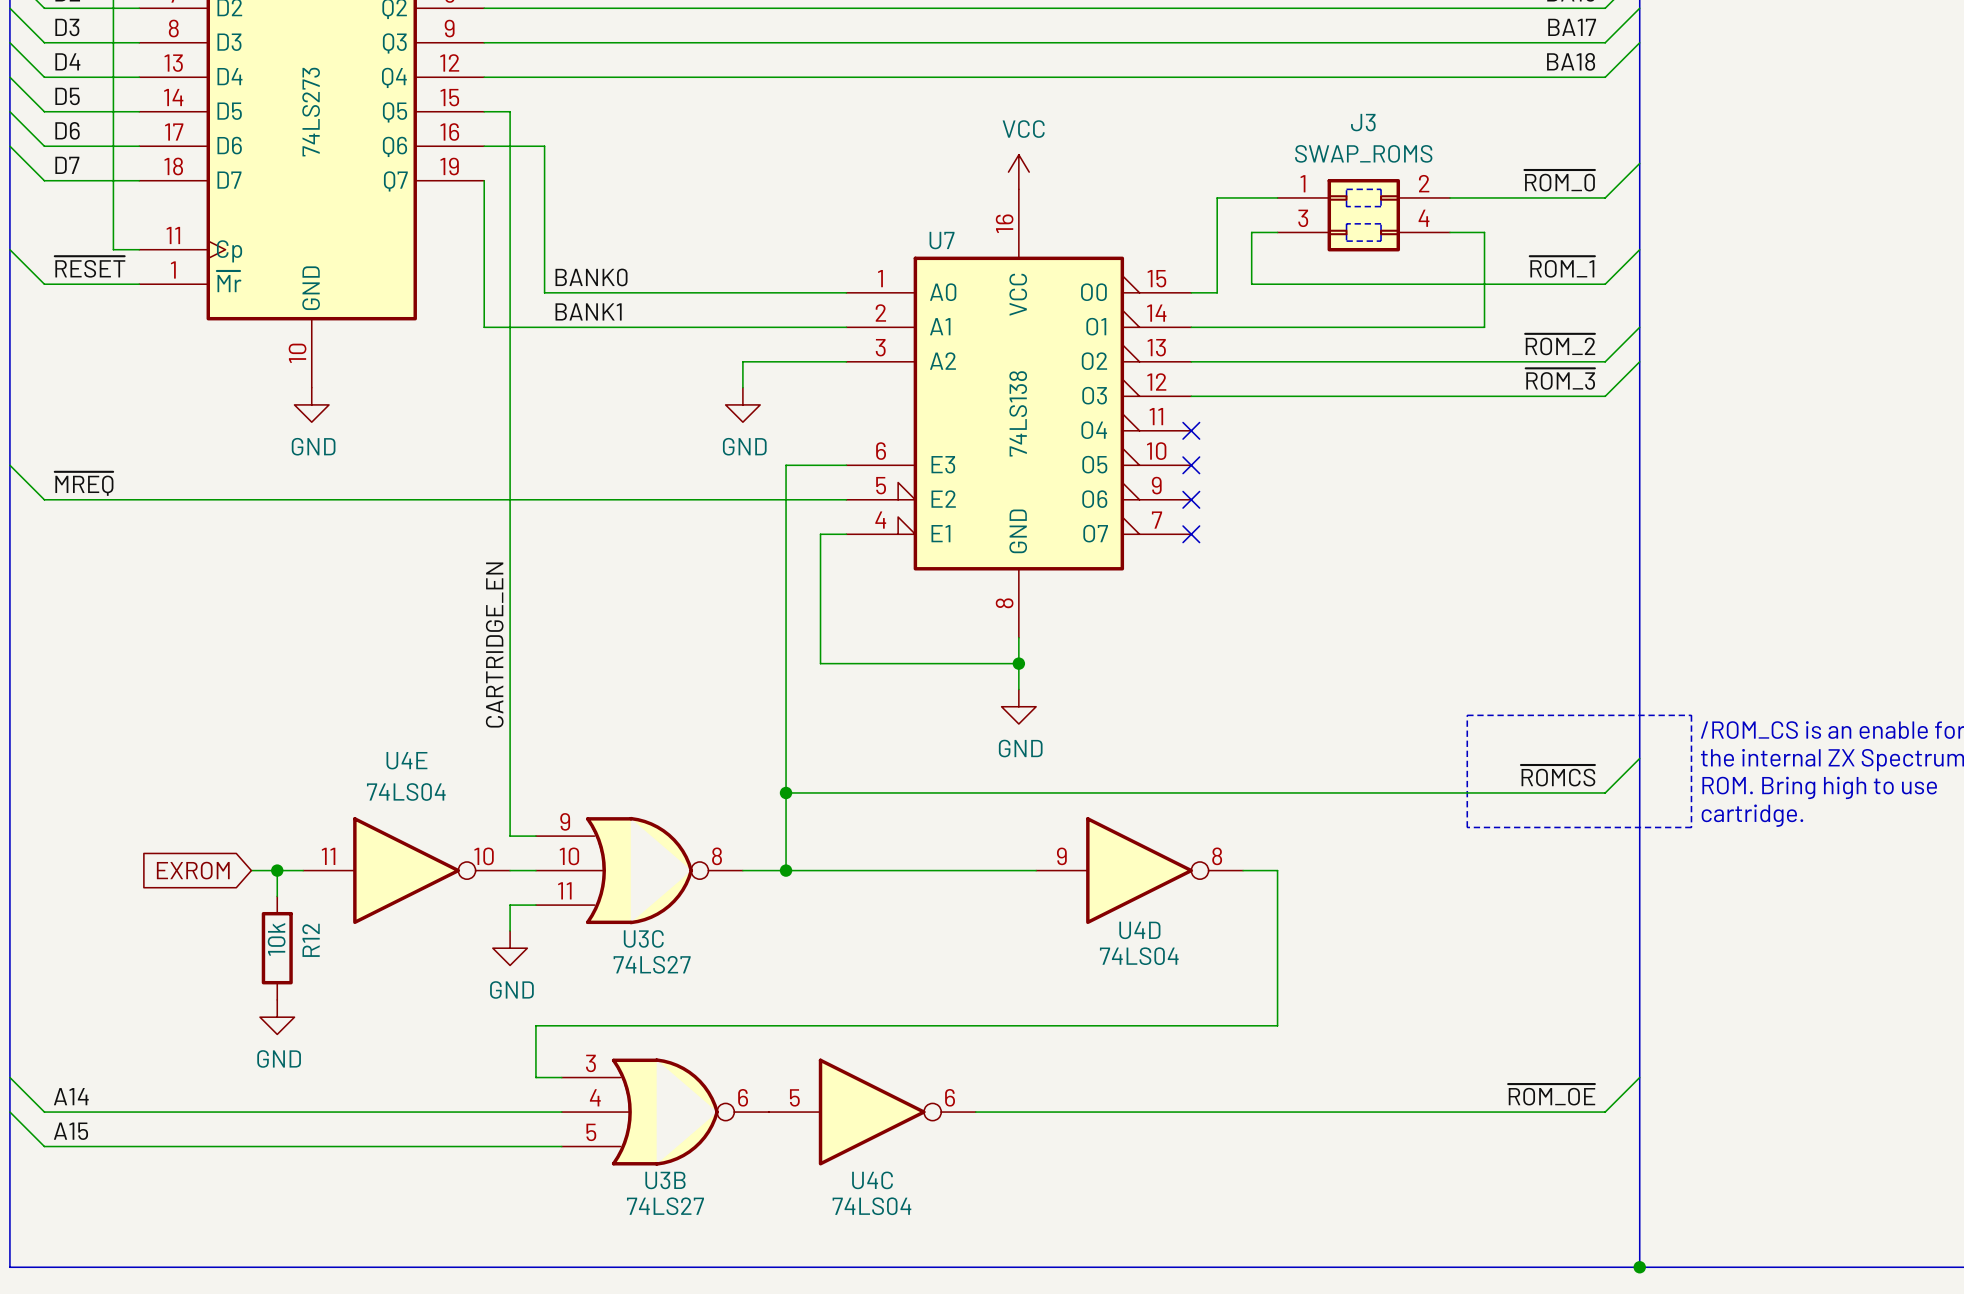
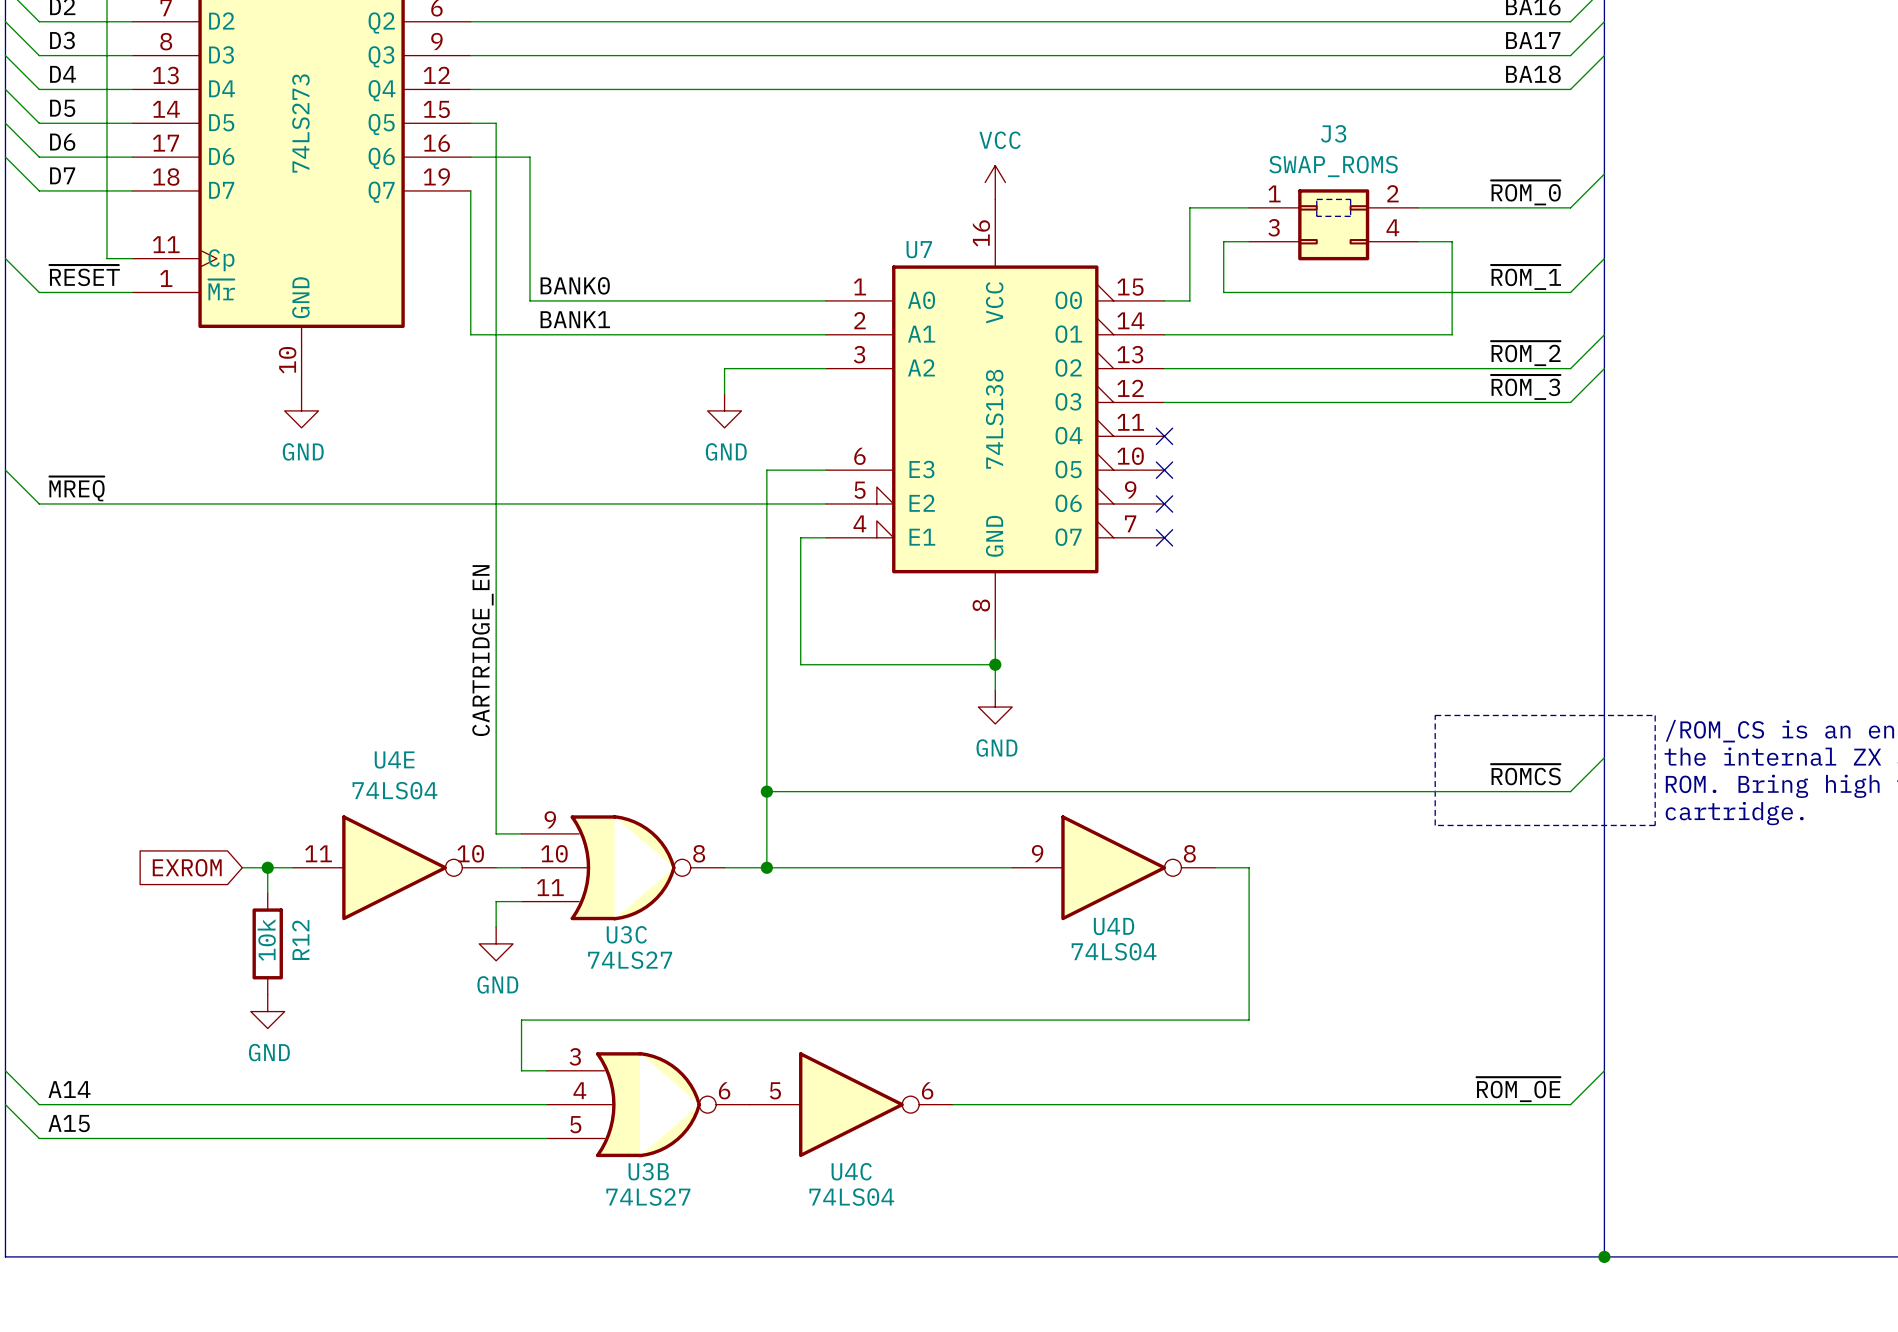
line: (1346, 223) (1346, 241) (1381, 241) (1381, 223) (1346, 223) -> none

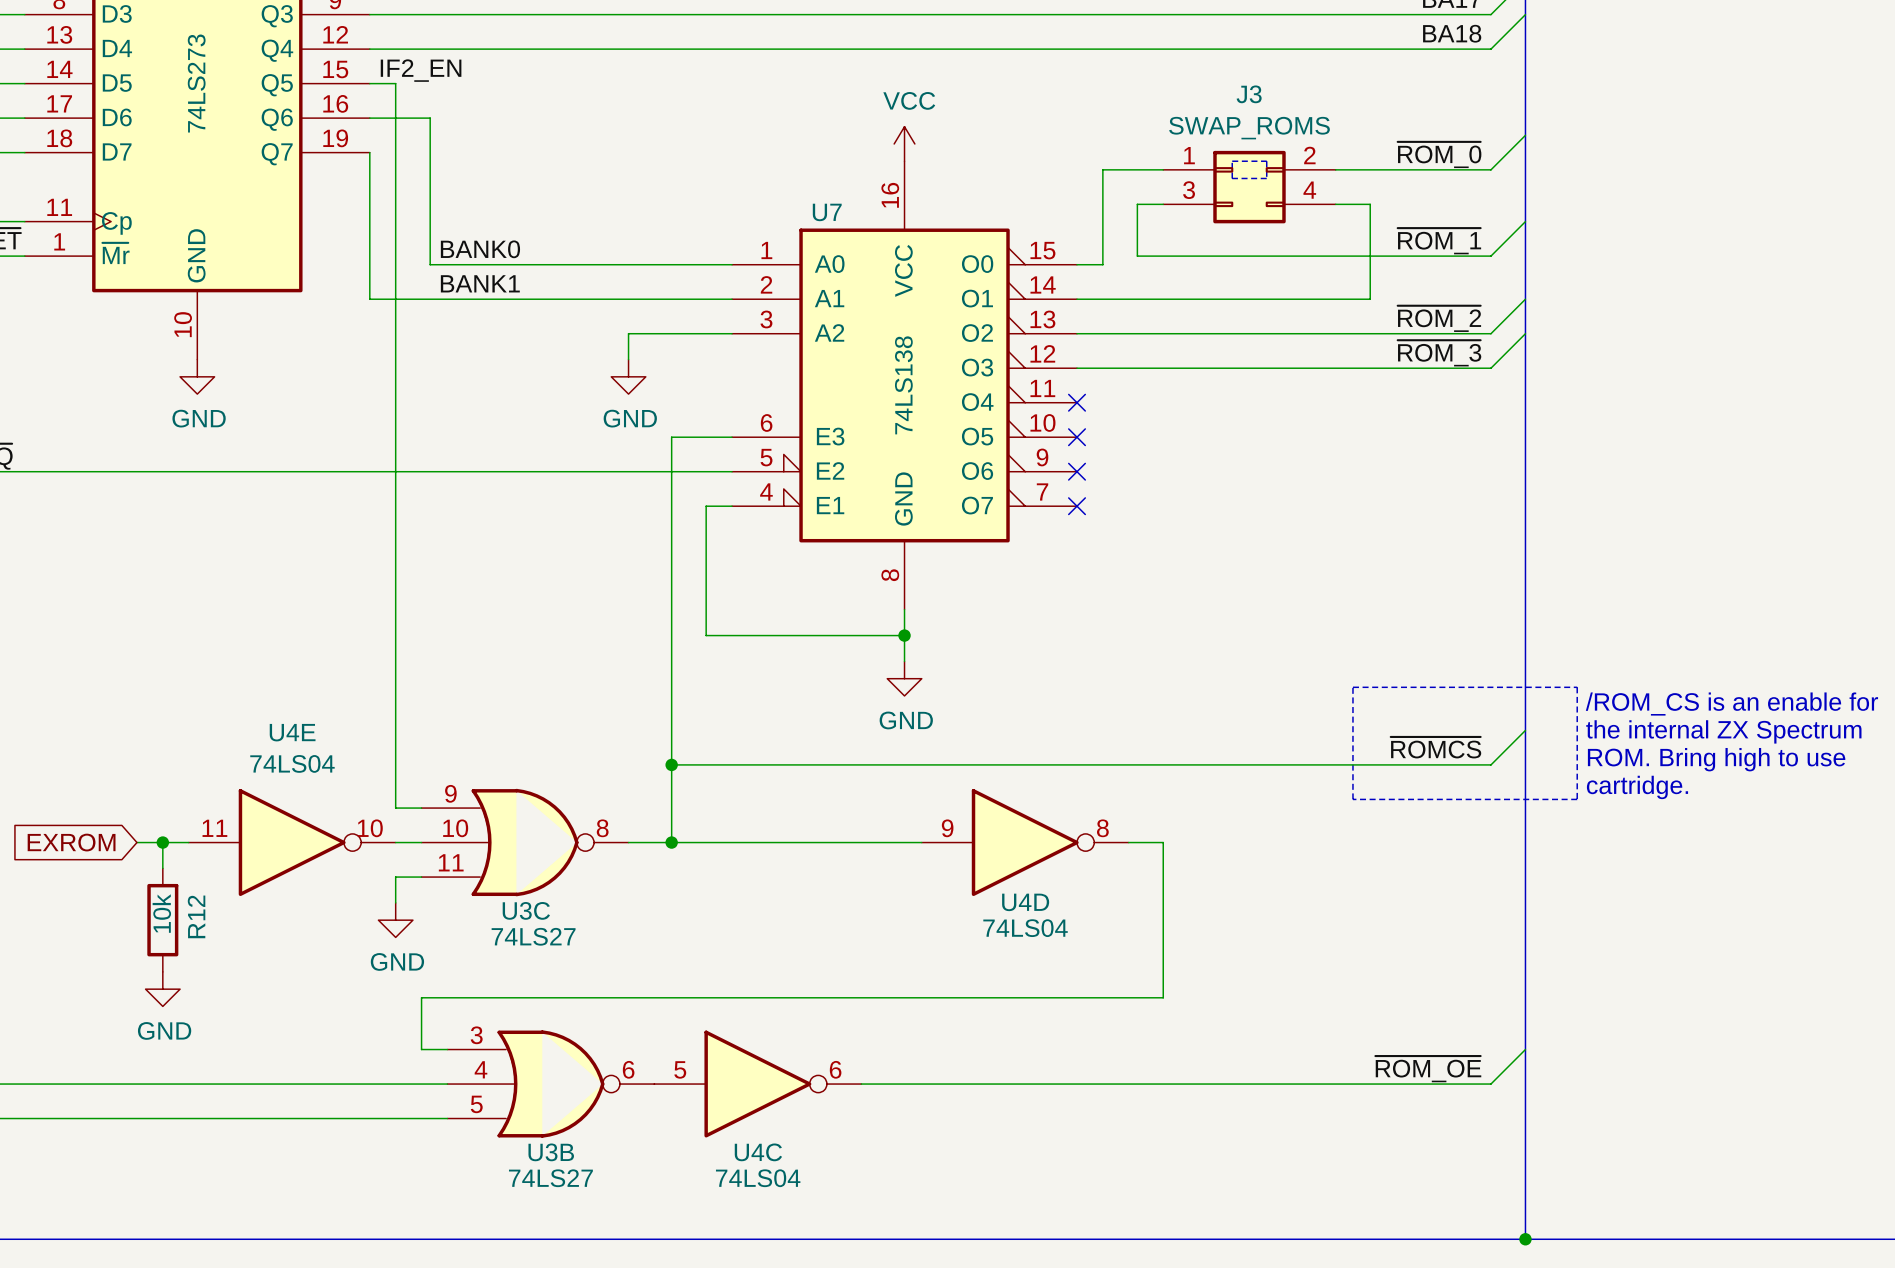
label: none -> IF2_EN (421, 70)
label: CARTRIDGE_EN (482, 650) -> none

